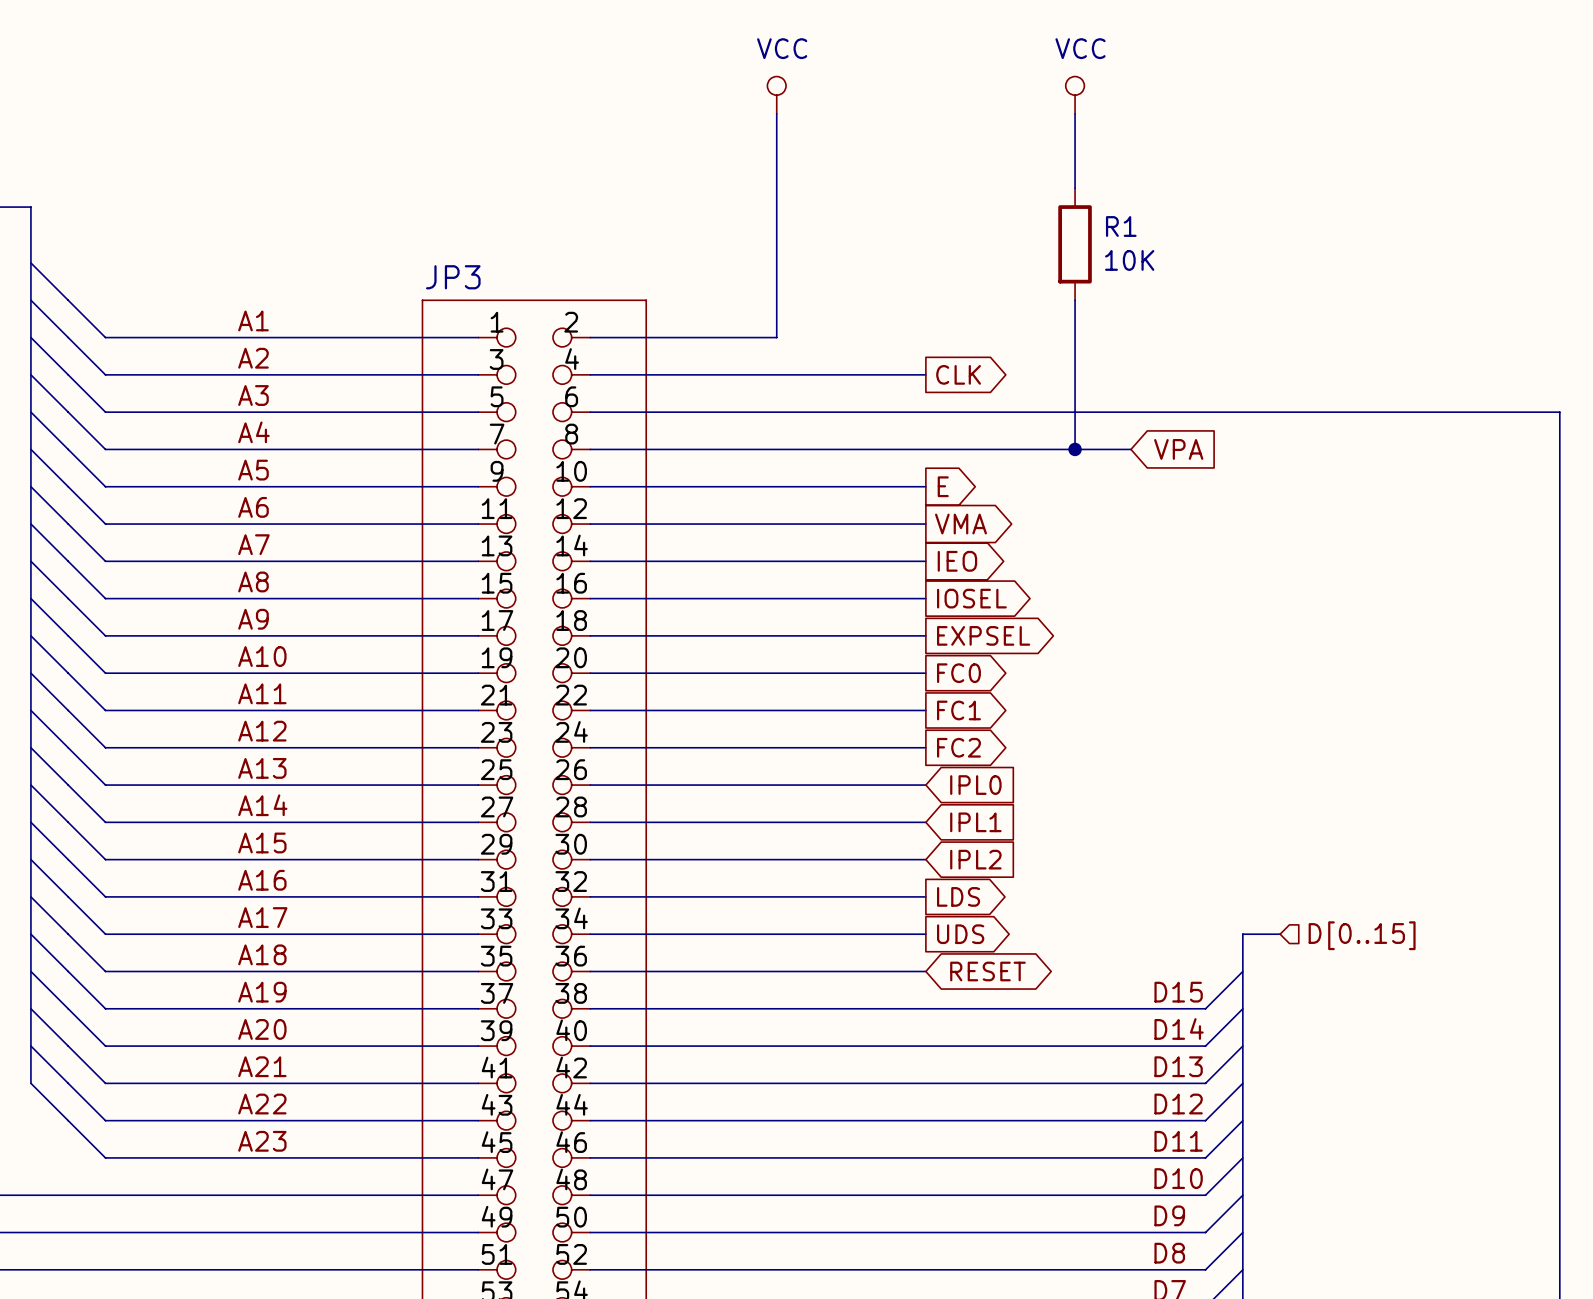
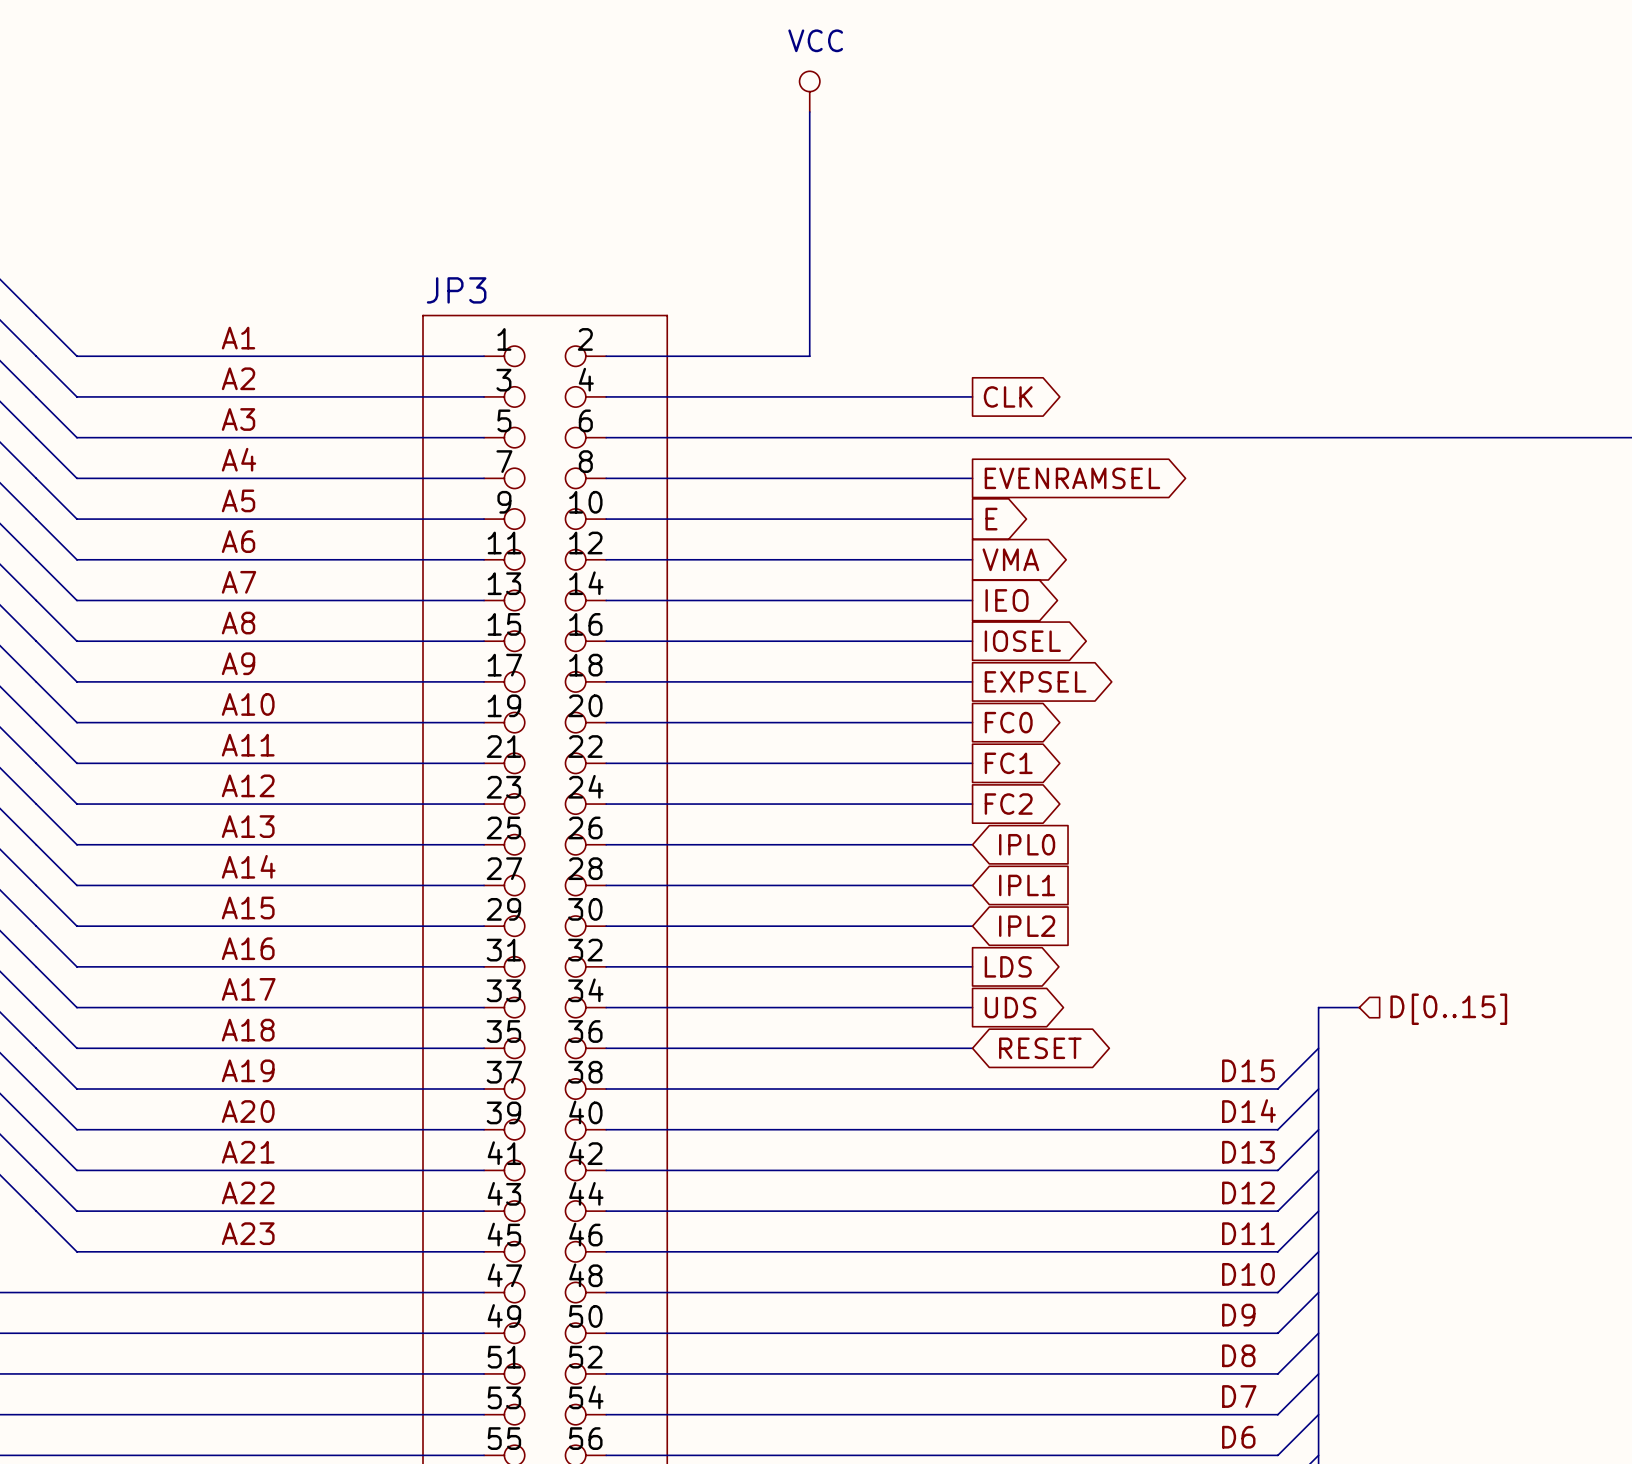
power symbol: VCC (1075, 95) -> none
wire: (1075, 113) (1075, 188) -> none
R1: 10K (1075, 244) -> none
wire: (1075, 300) (1075, 449) -> none
wire: (925, 449) (1130, 449) -> none
global label: none -> EVENRAMSEL (1072, 478)
junction: (1075, 449) -> none
global label: VPA (1178, 449) -> none

